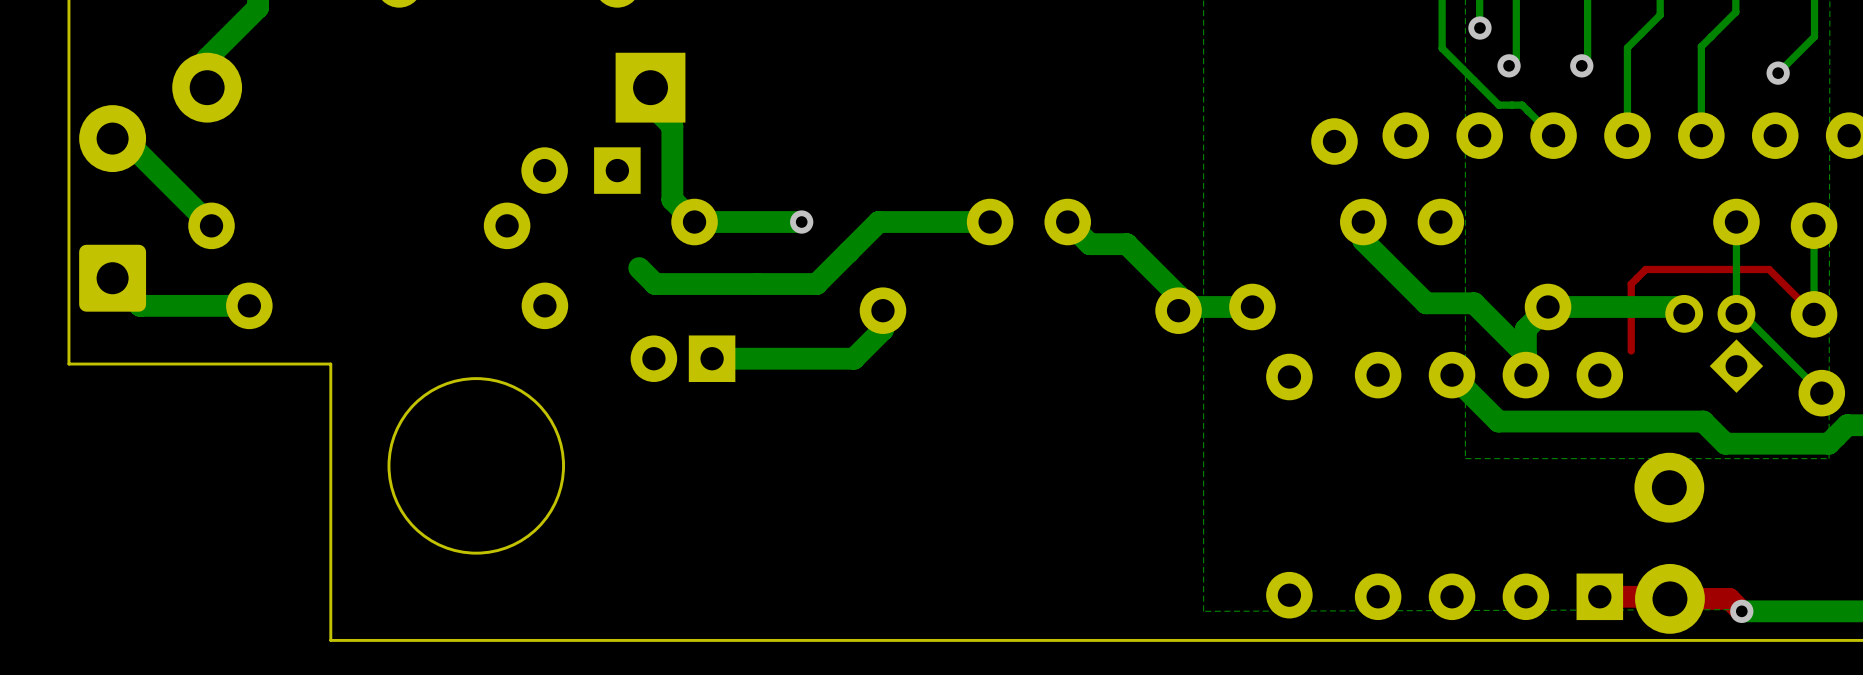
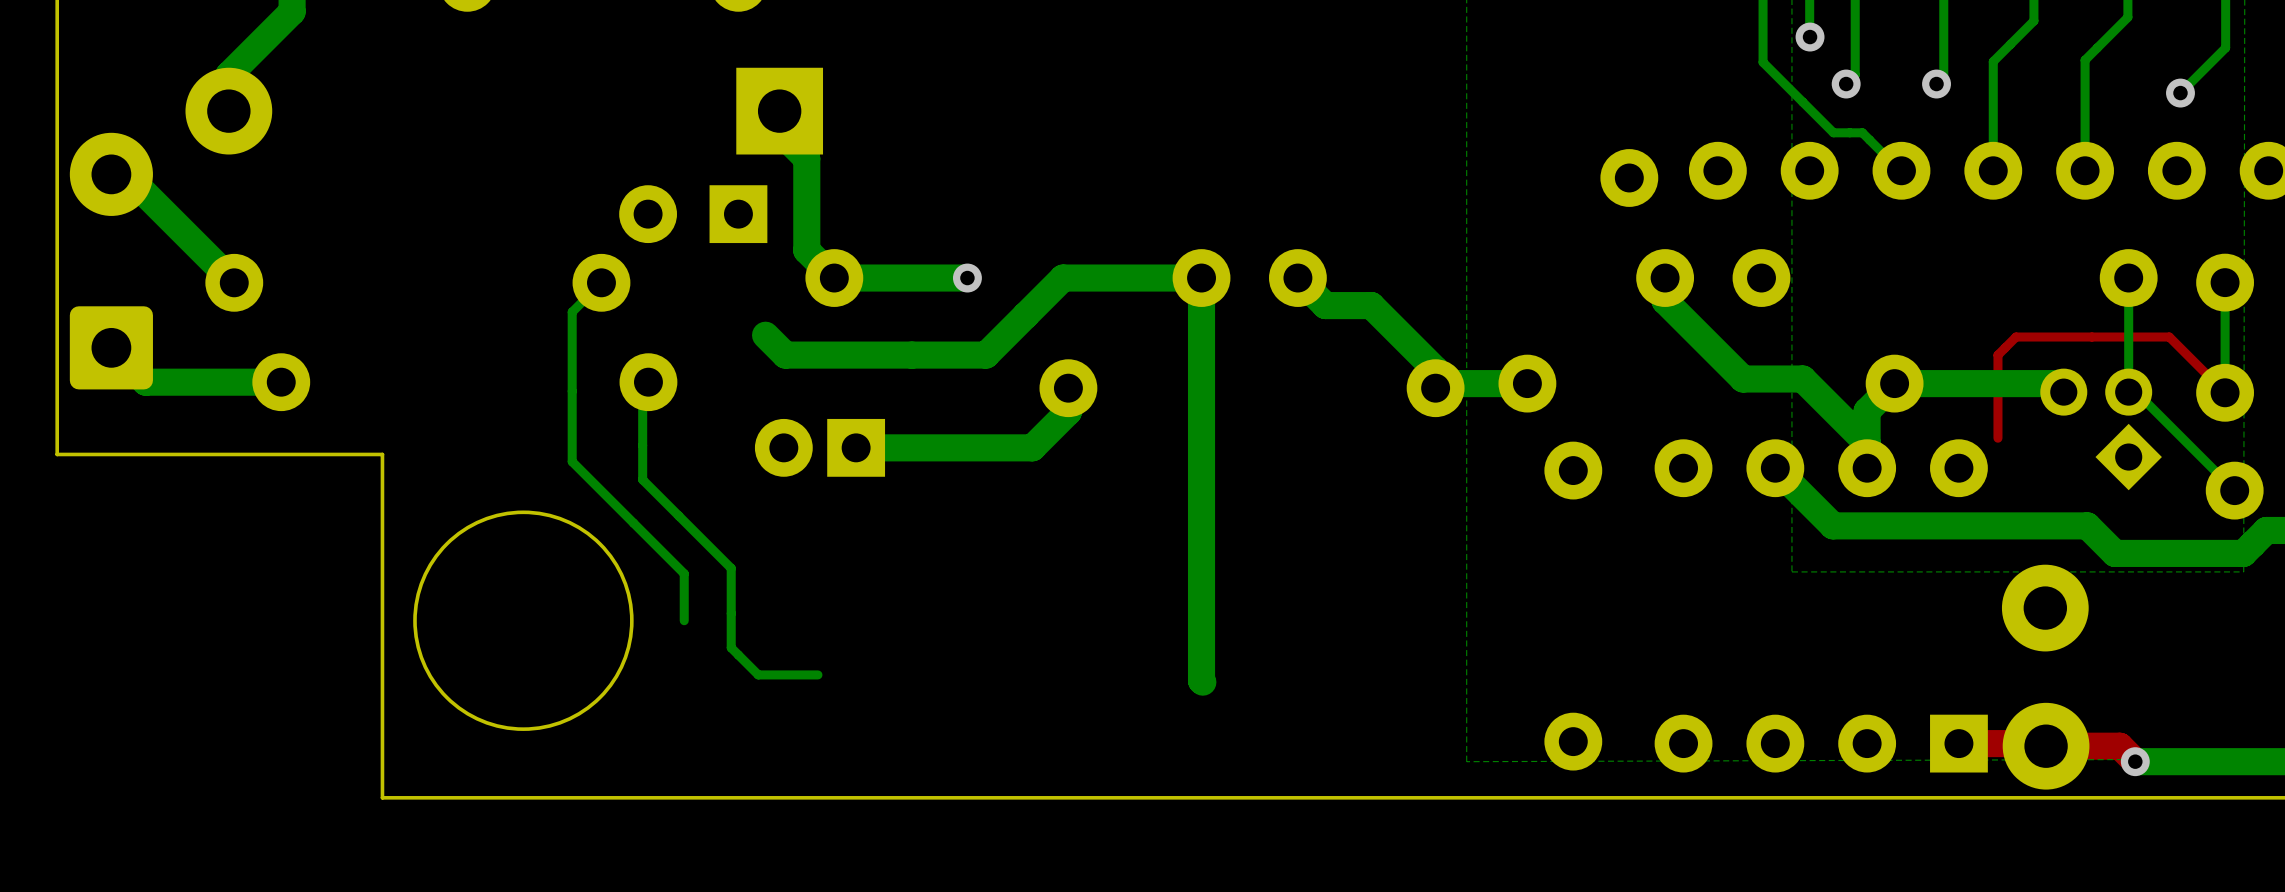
bottom track: none -> (1201, 278) (1202, 682)
bottom track: none -> (601, 282) (572, 312) (572, 461) (684, 573) (684, 620)
bottom track: none -> (648, 382) (642, 387) (642, 479) (731, 568) (731, 647) (758, 674) (817, 674)
round board edge position: (476, 465) -> (523, 620)

